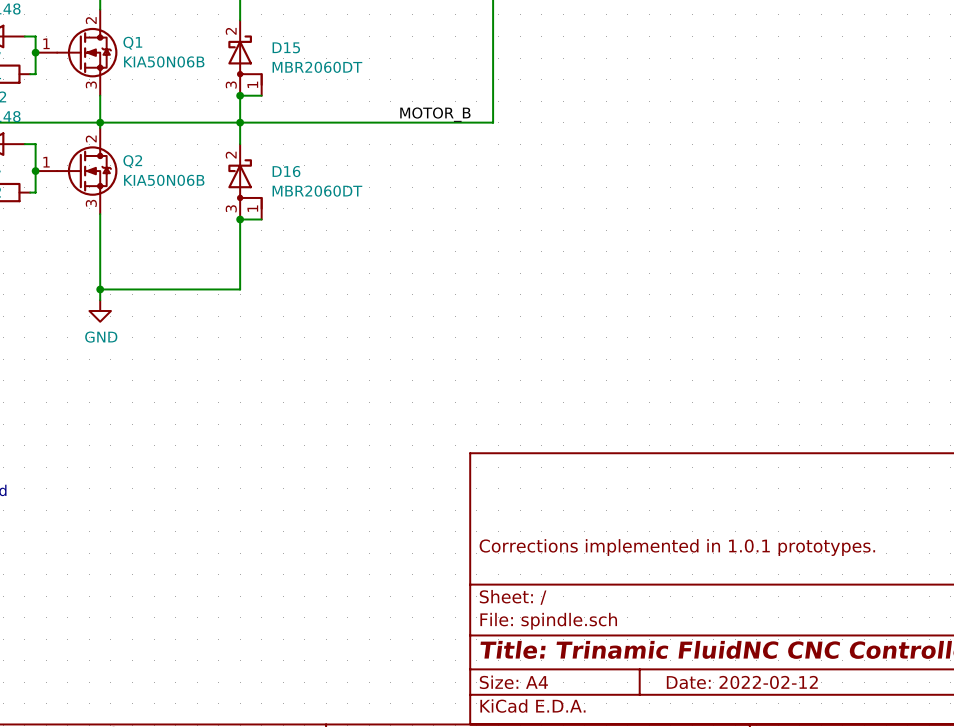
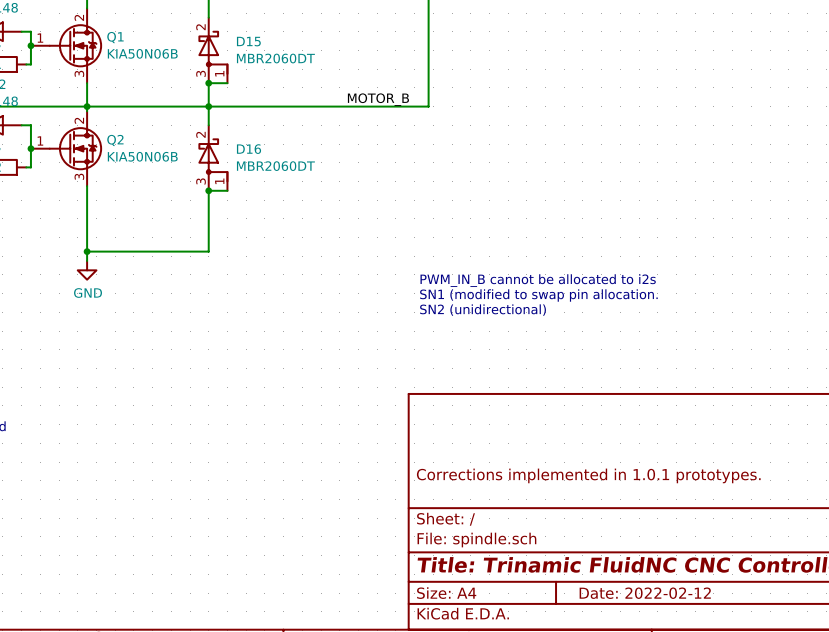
text: none -> PWM_IN_B cannot be allocated to i2s (538, 280)
text: none -> SN1 (modified to swap pin allocation. (538, 295)
text: none -> SN2 (unidirectional) (483, 310)

